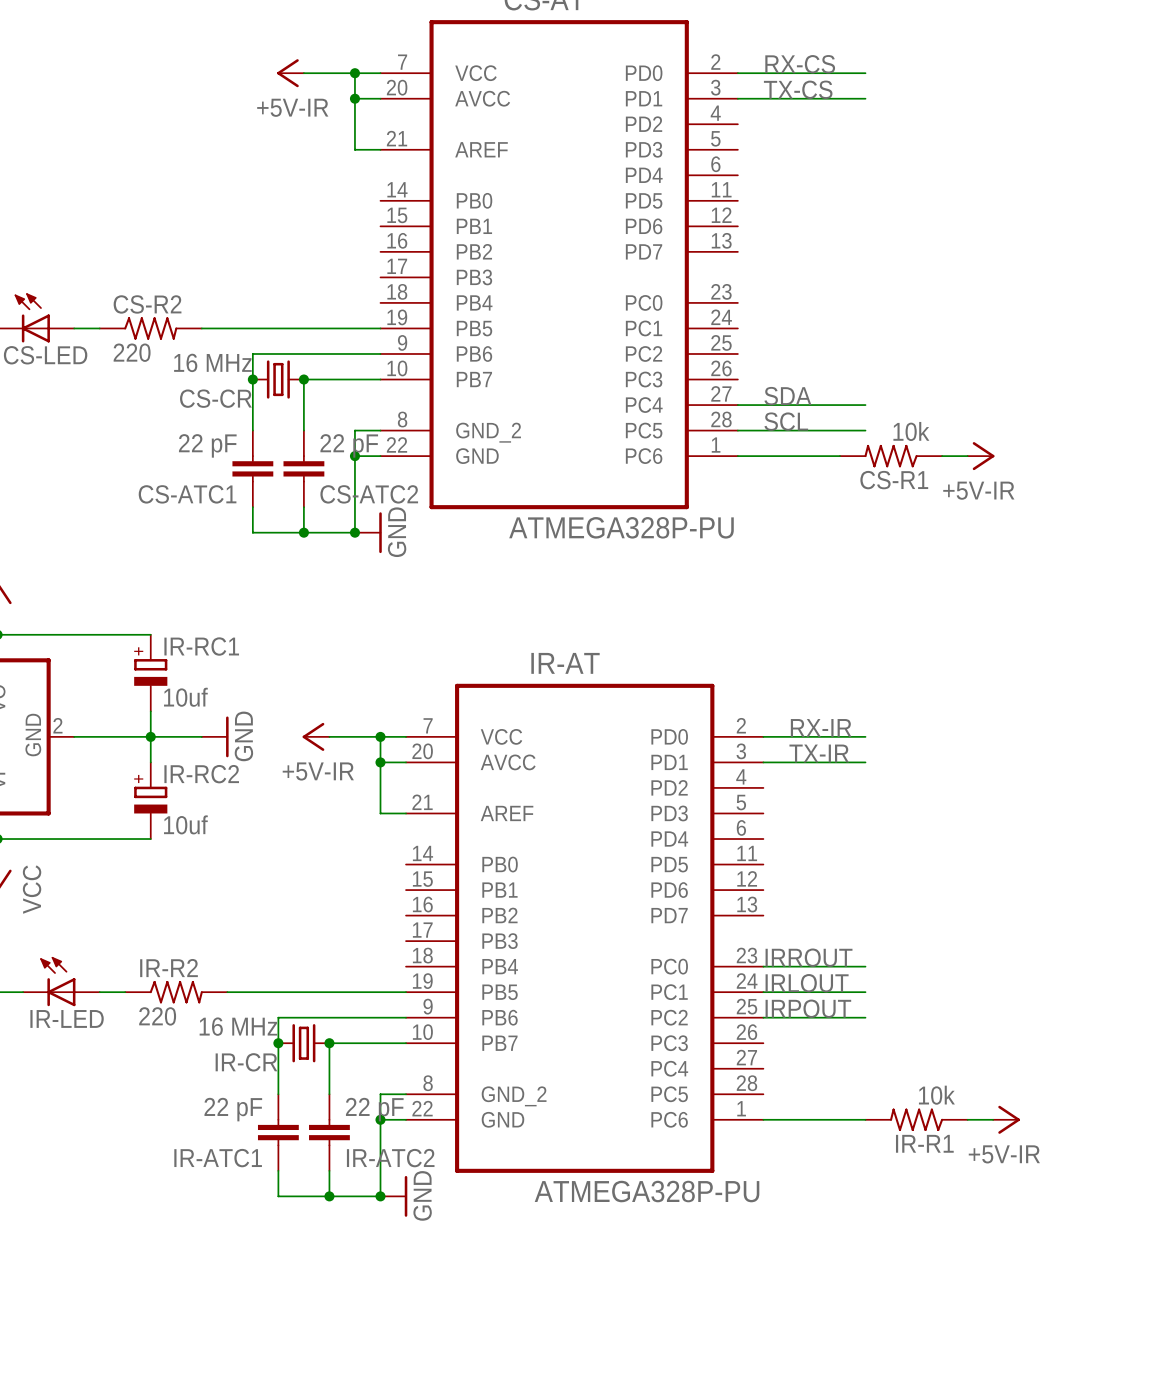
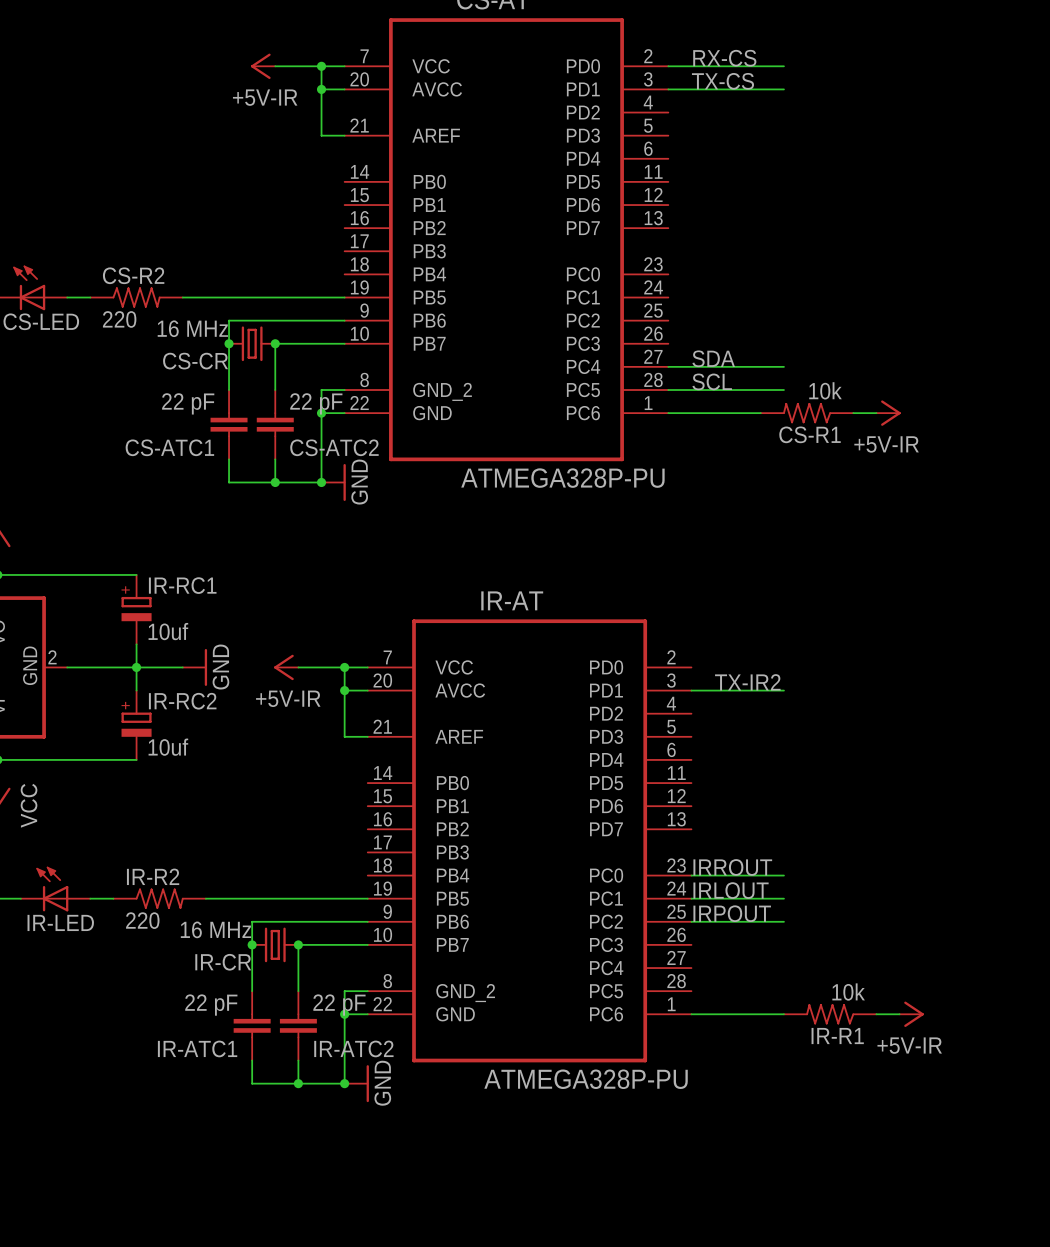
label: RX-IR (821, 727) -> none
wire: (763, 736) (865, 736) -> none
label: TX-IR (819, 753) -> TX-IR2 (747, 682)

